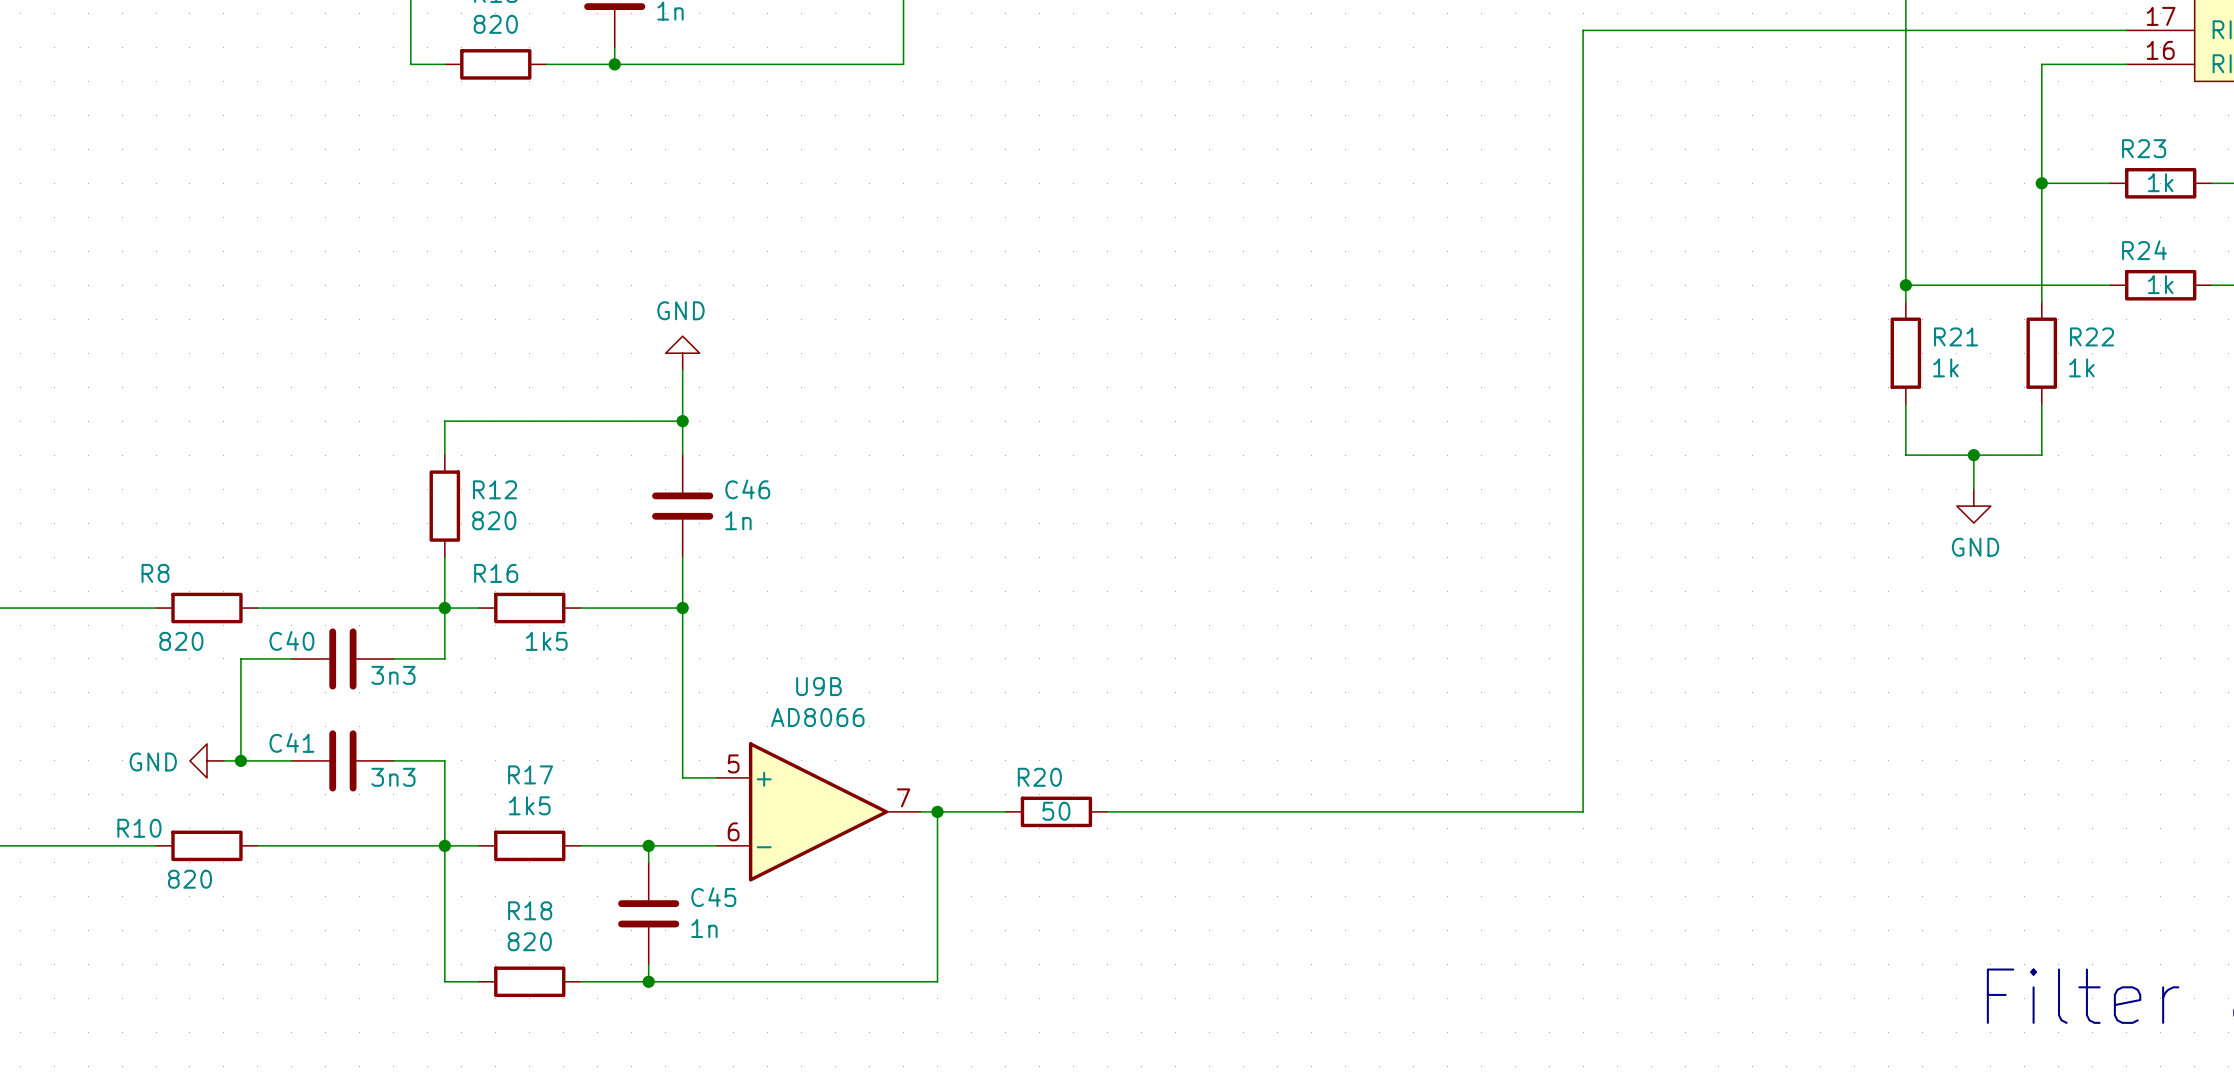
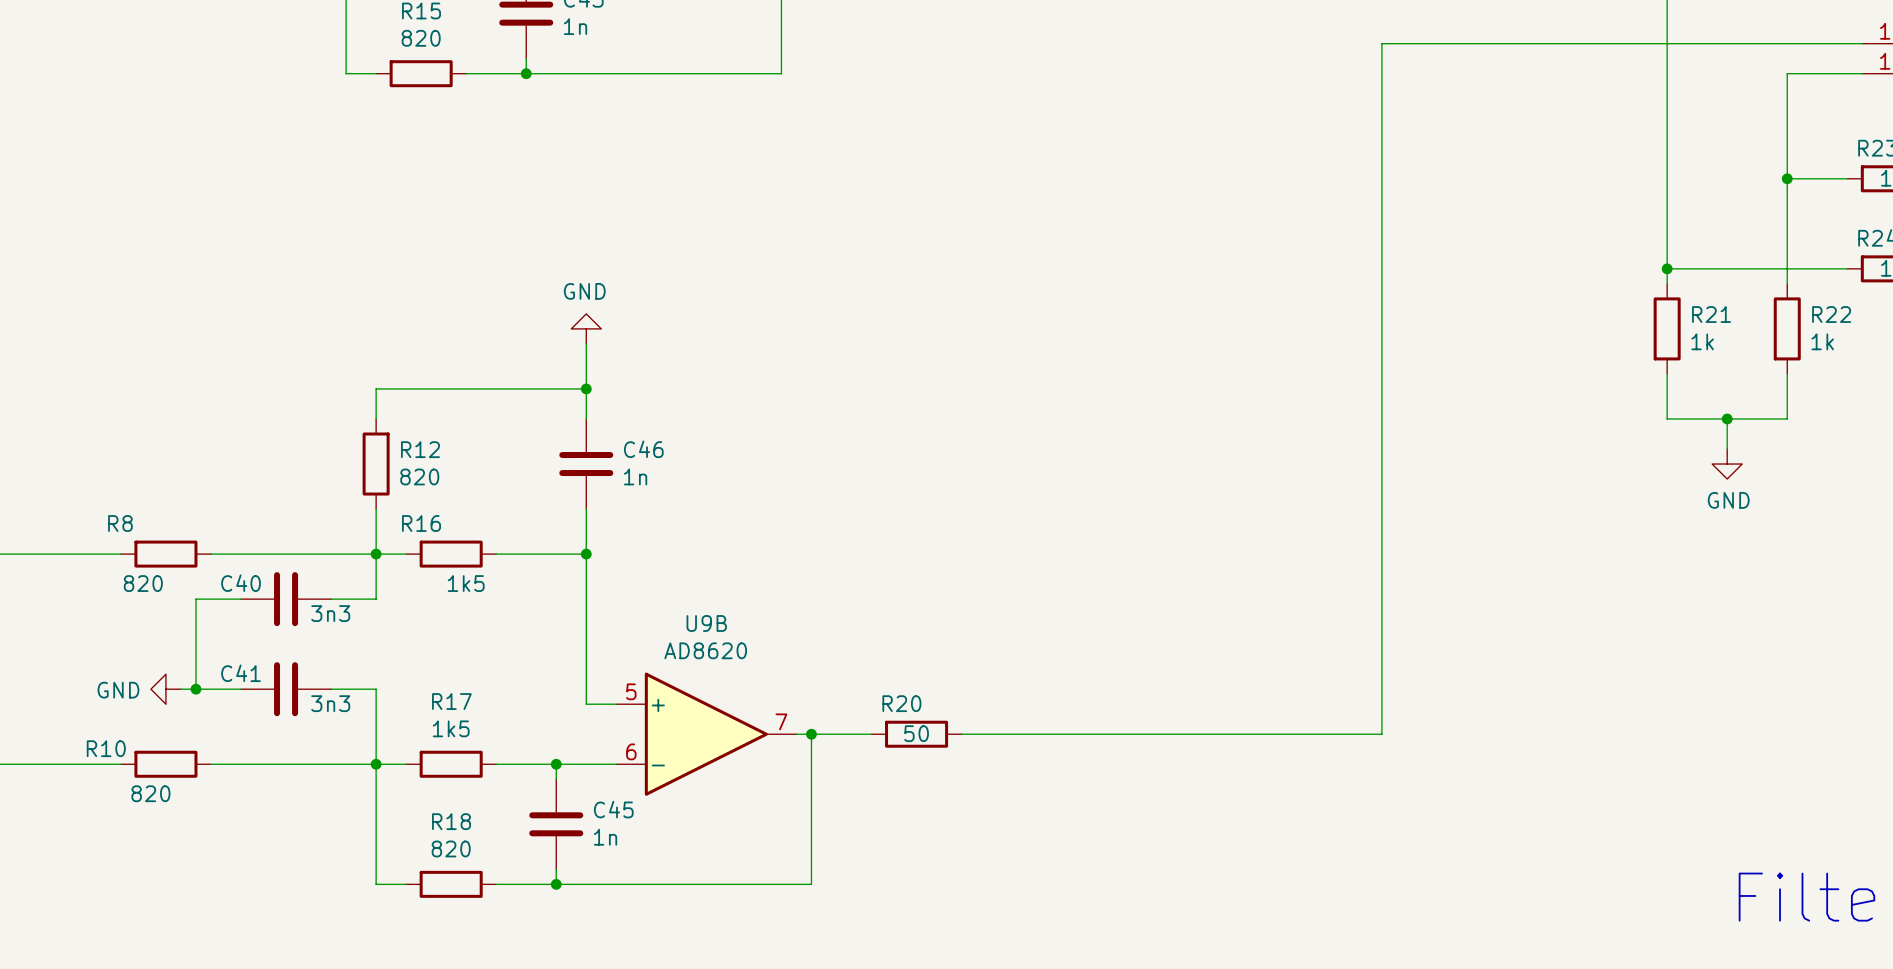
U9B value: AD8066 (817, 717) -> AD8620 (705, 650)

